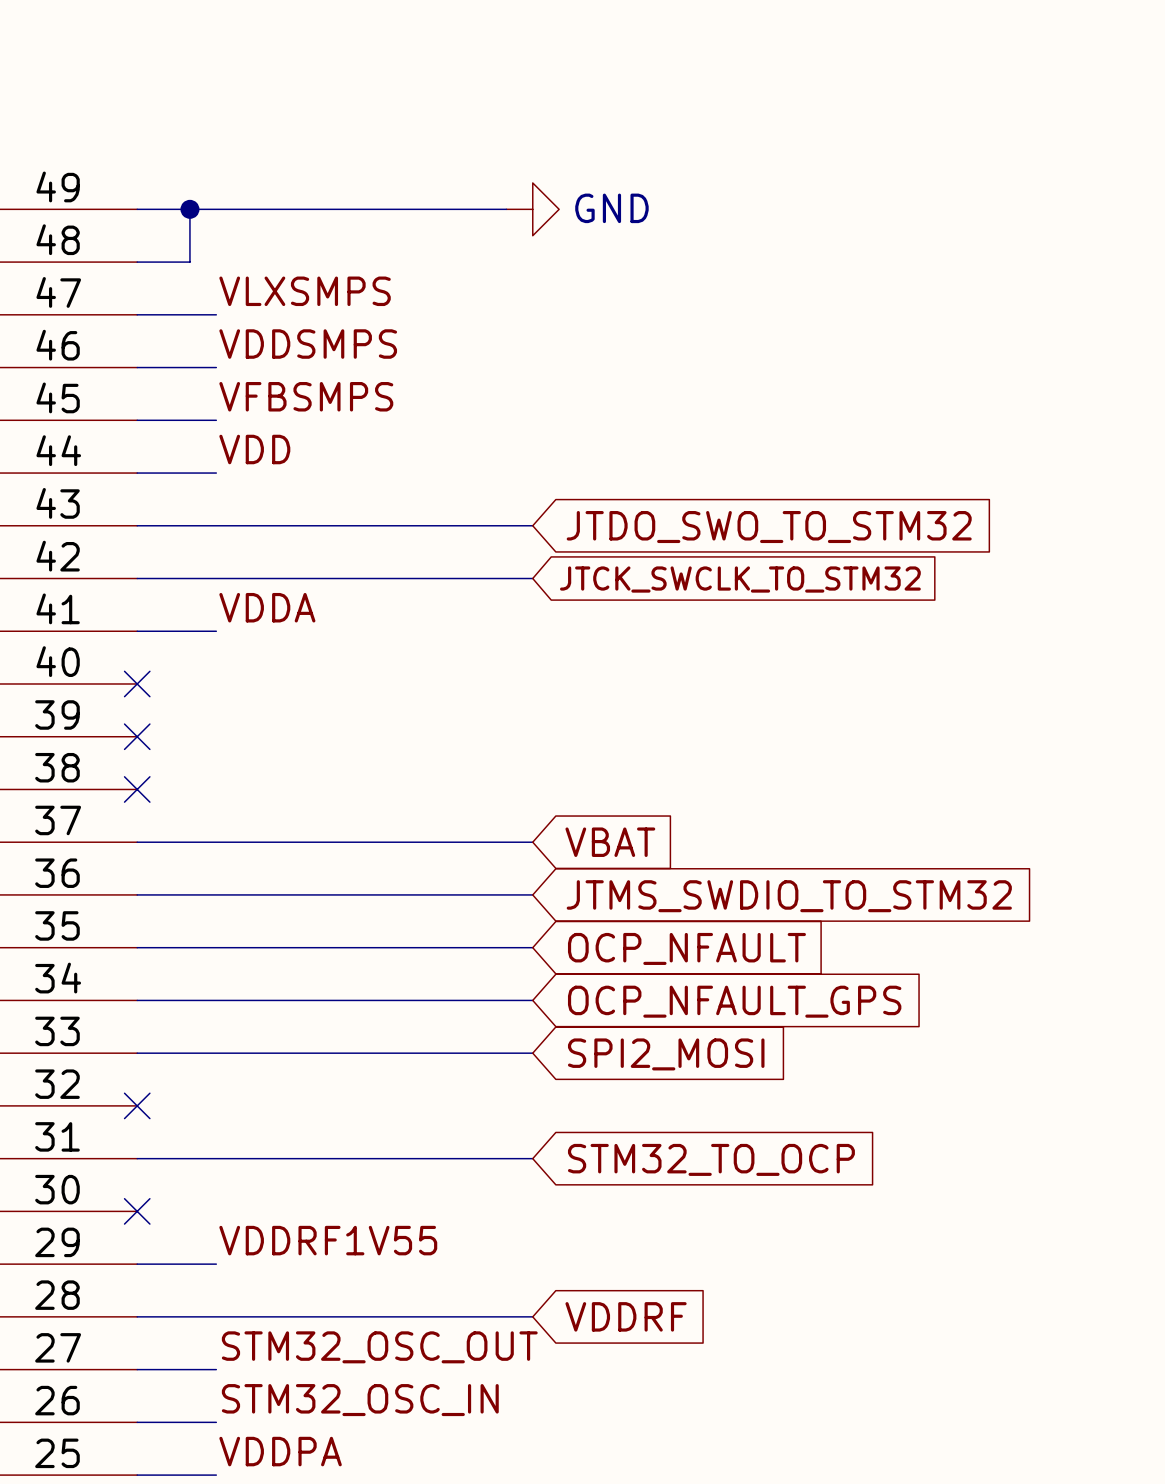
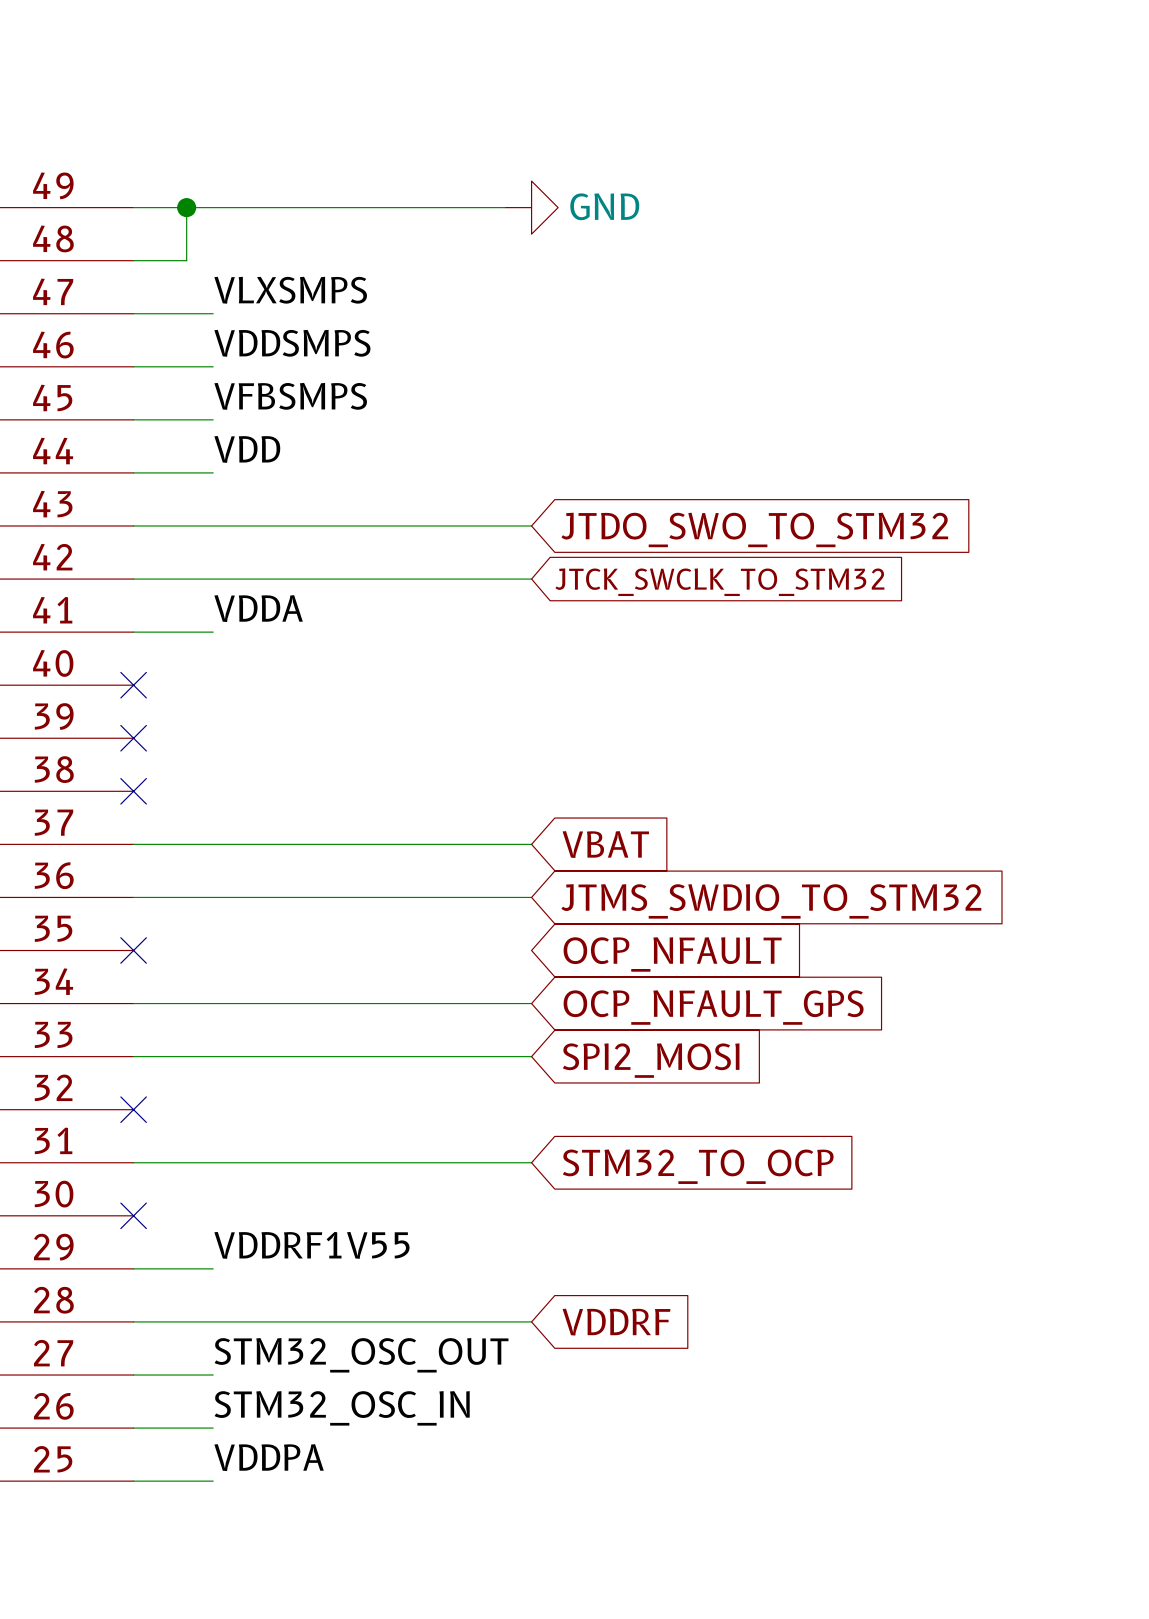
wire: (137, 947) (532, 947) -> none
no-connect mark: none -> (133, 950)

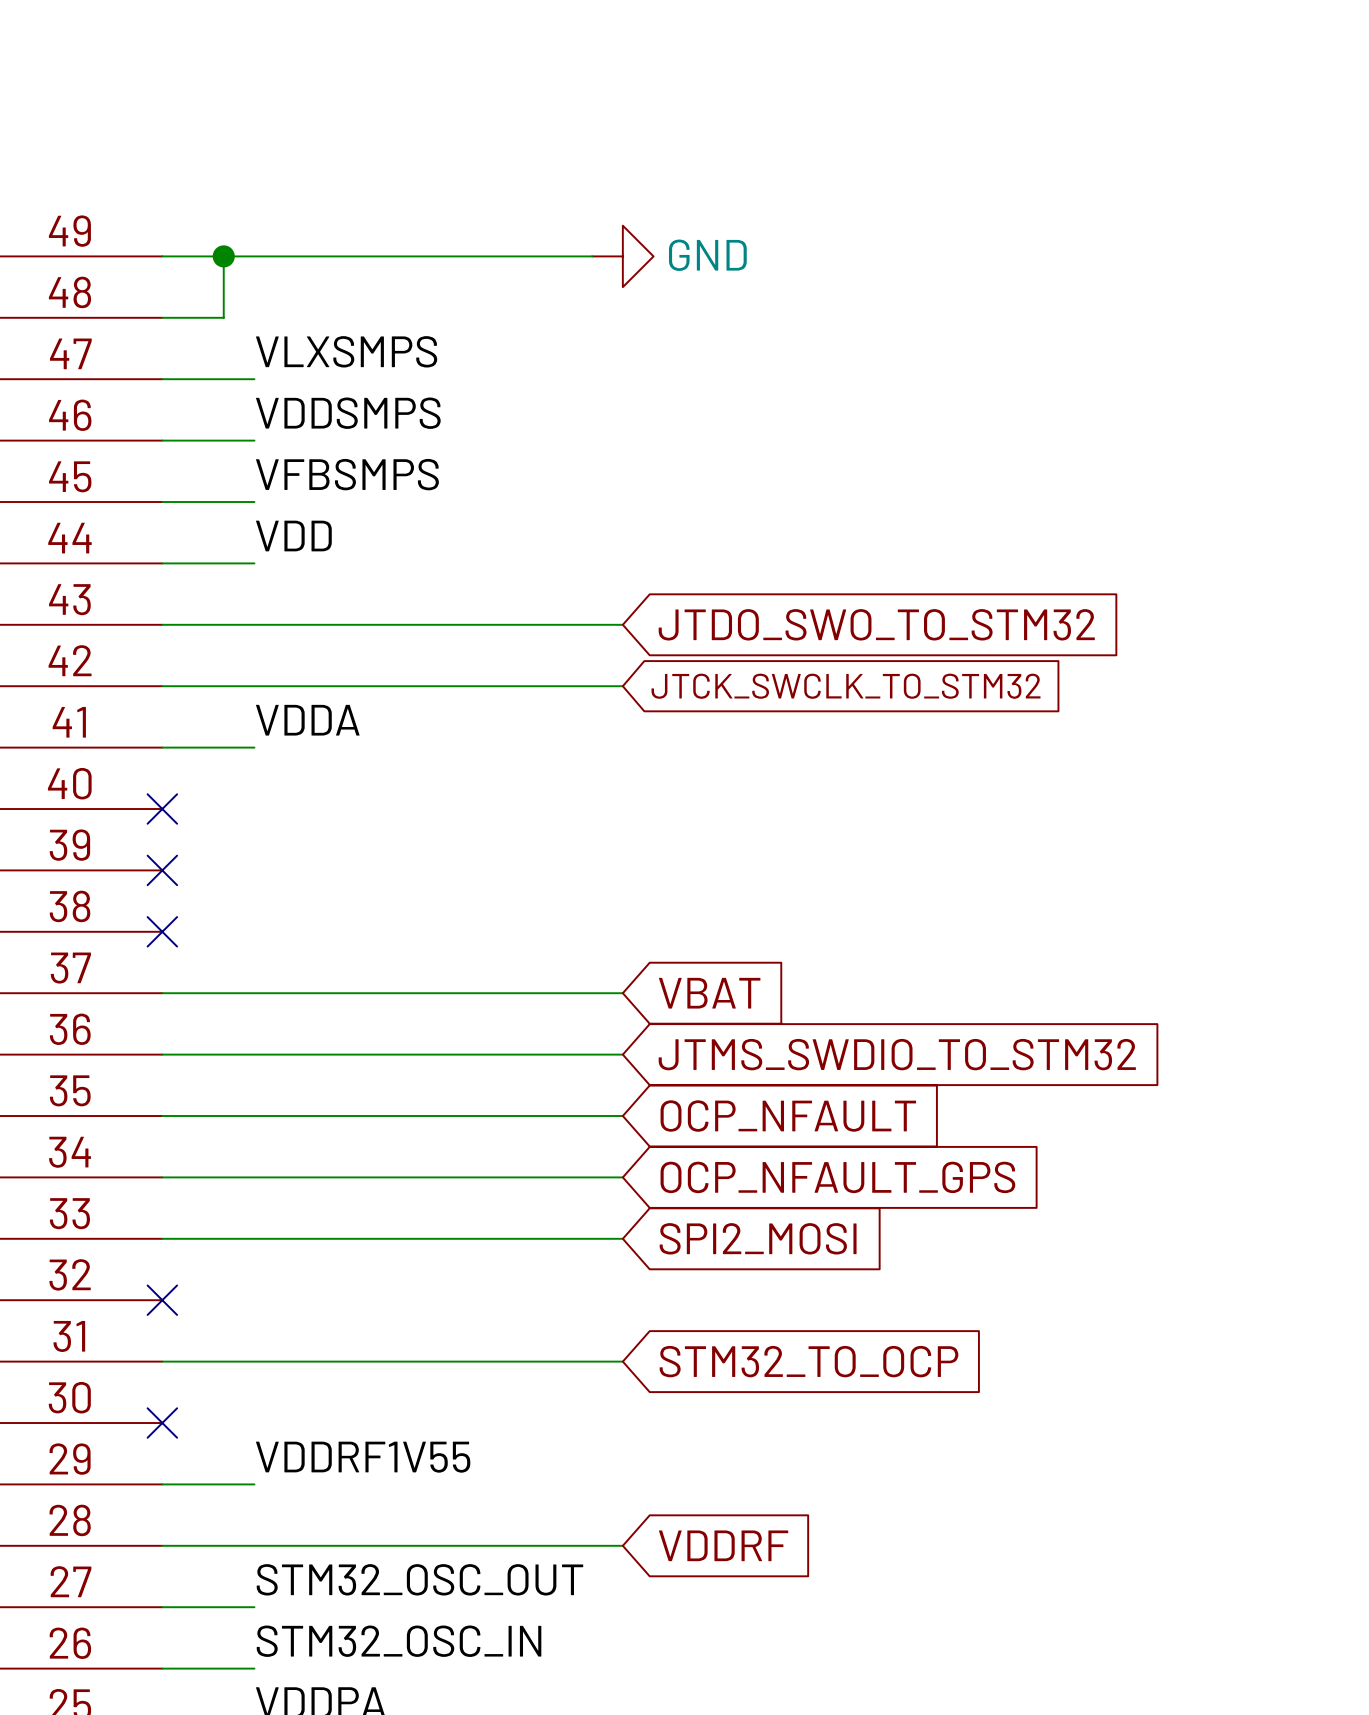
wire: none -> (162, 1116) (622, 1116)
no-connect mark: (133, 950) -> none

